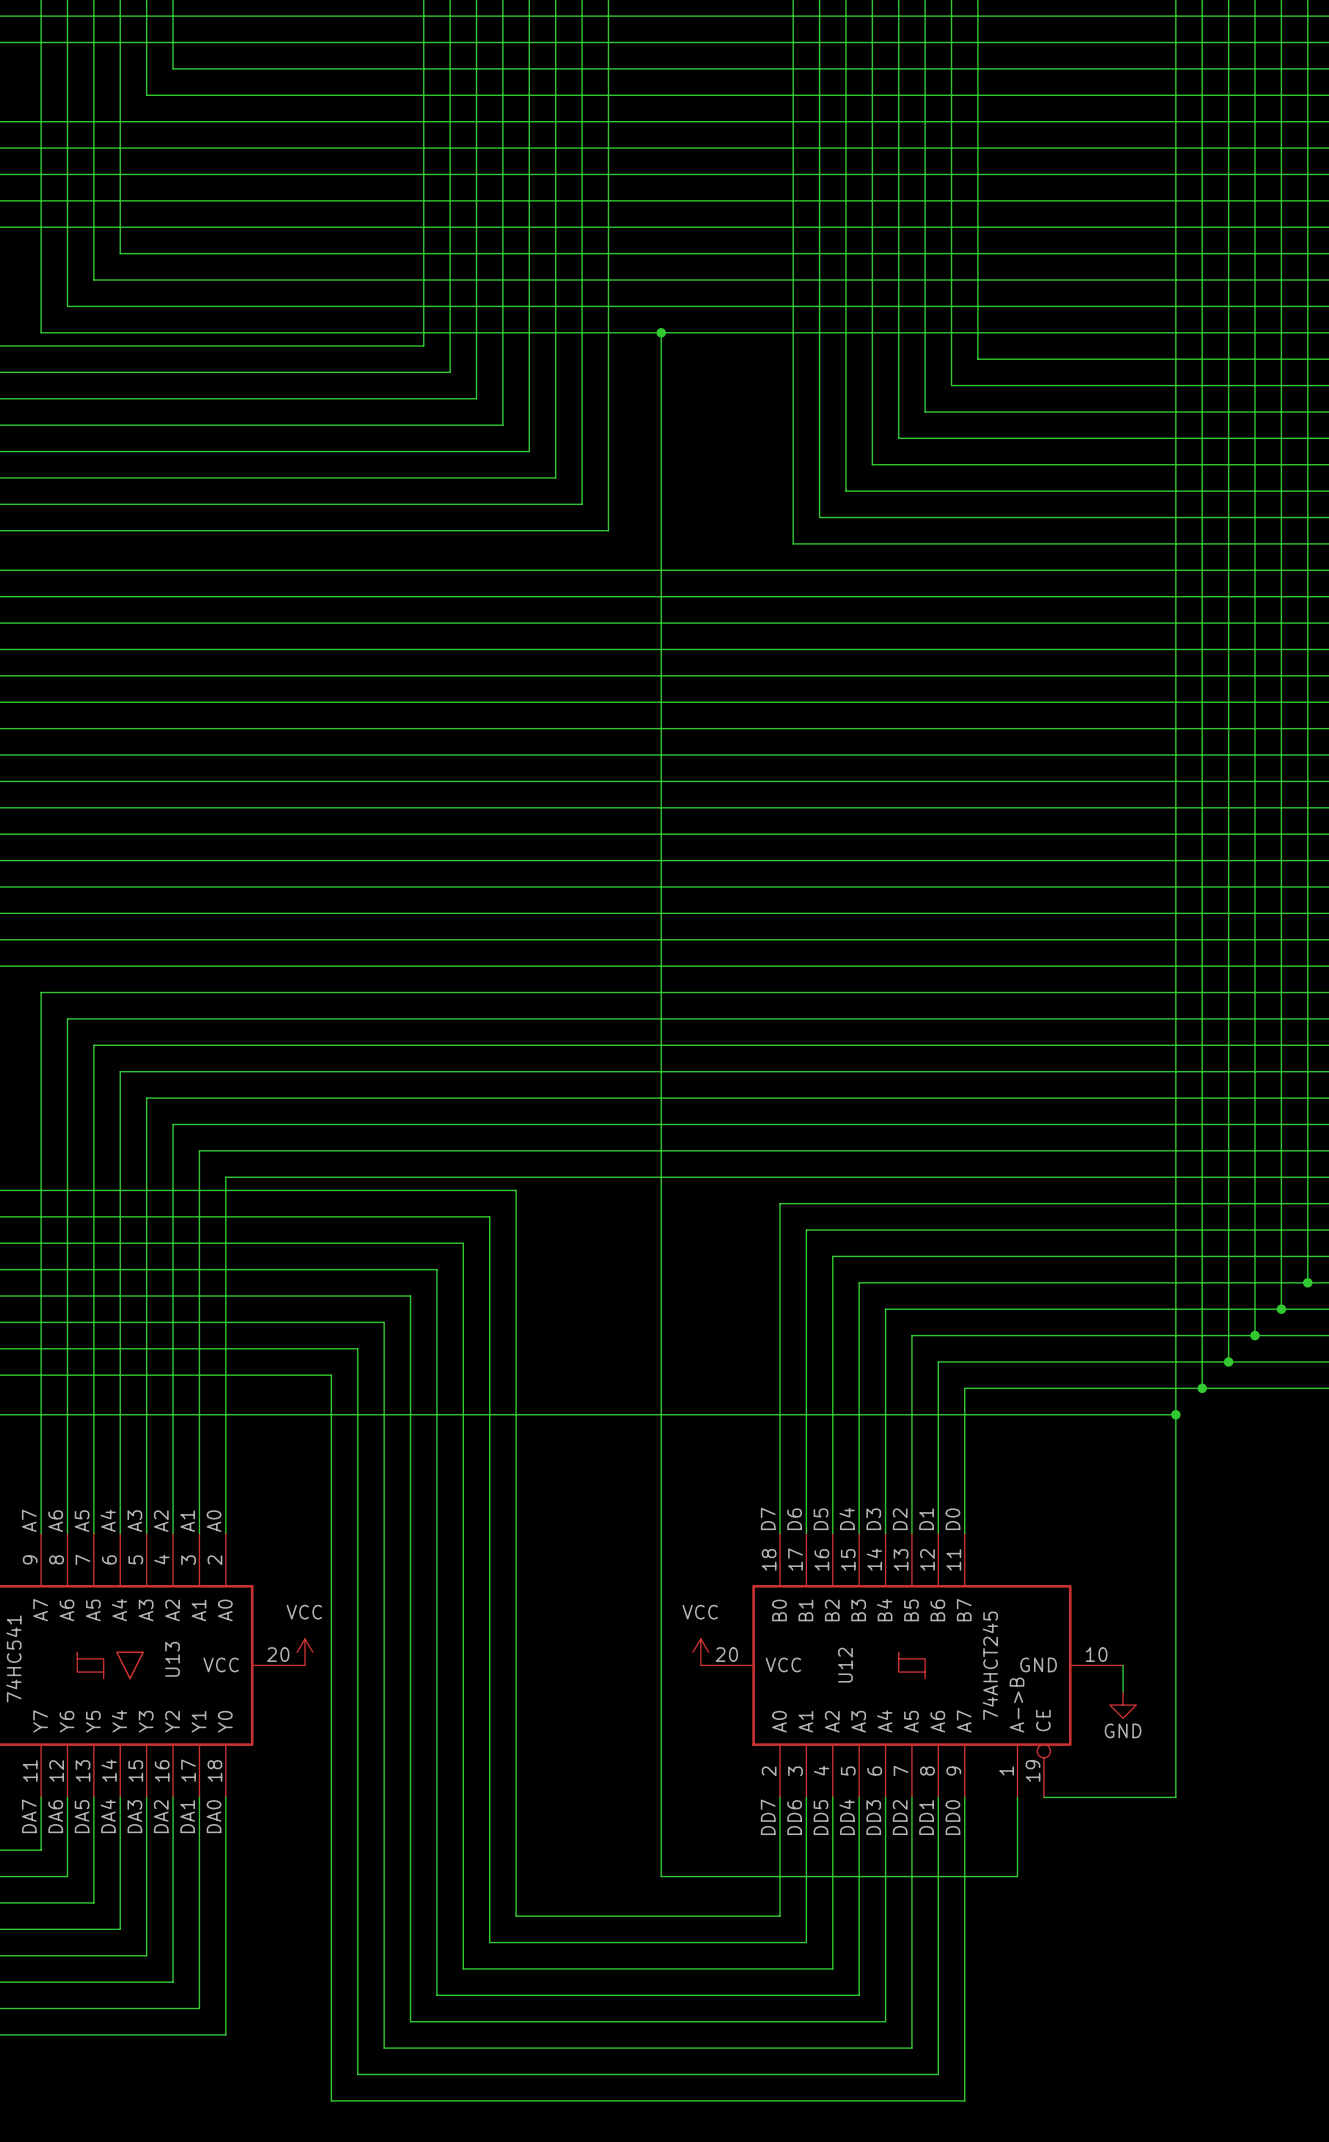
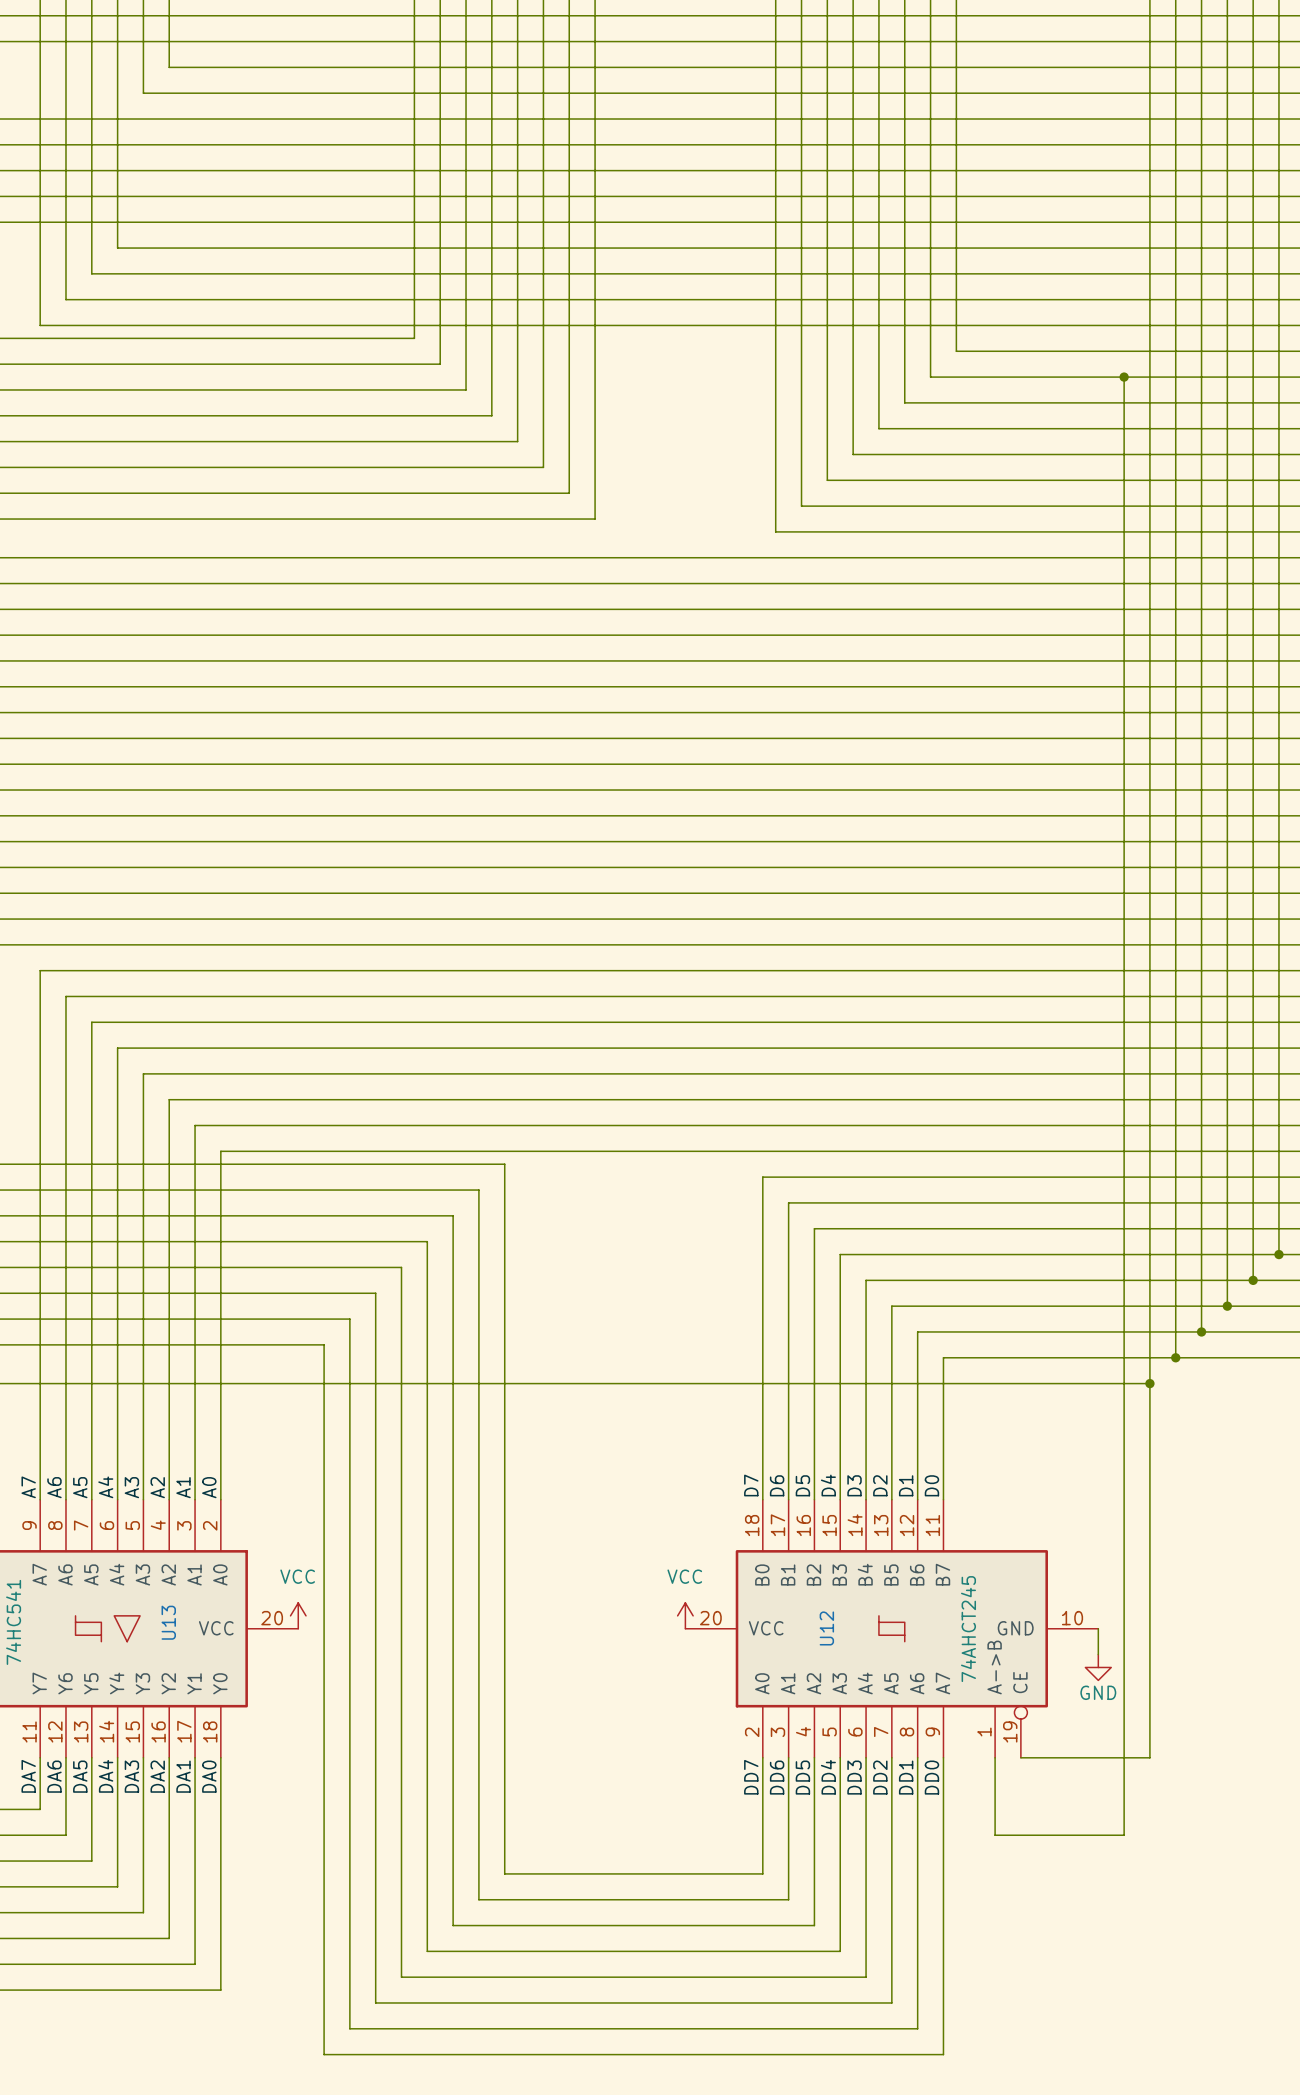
wire: (661, 332) (661, 1876) (1017, 1876) -> (1124, 377) (1124, 1835) (995, 1835)
junction: (661, 332) -> none
junction: none -> (1124, 377)

